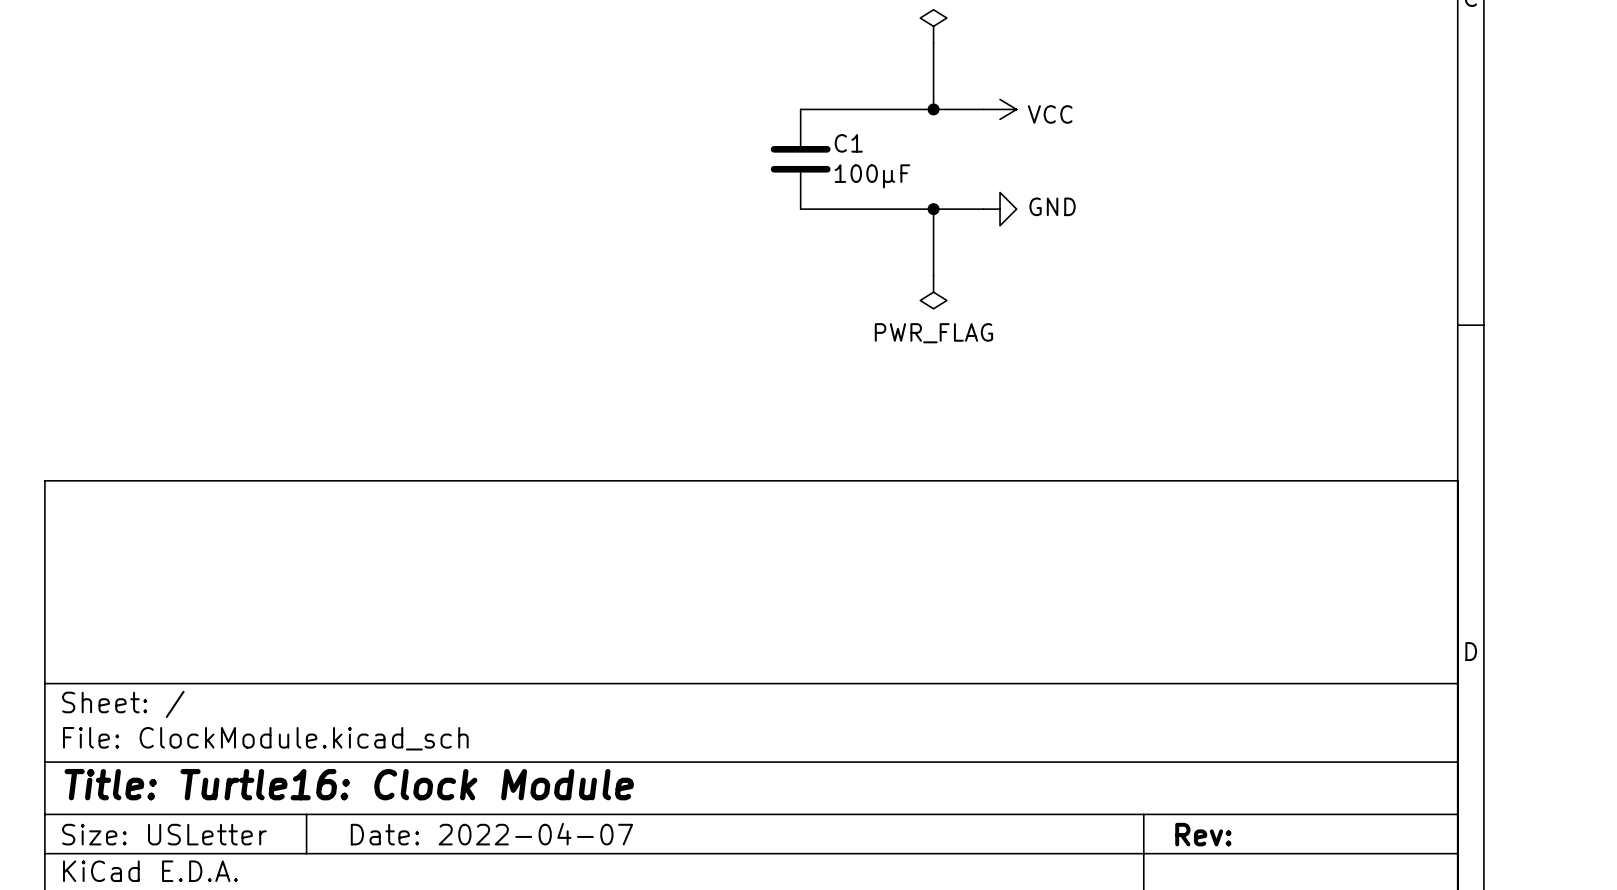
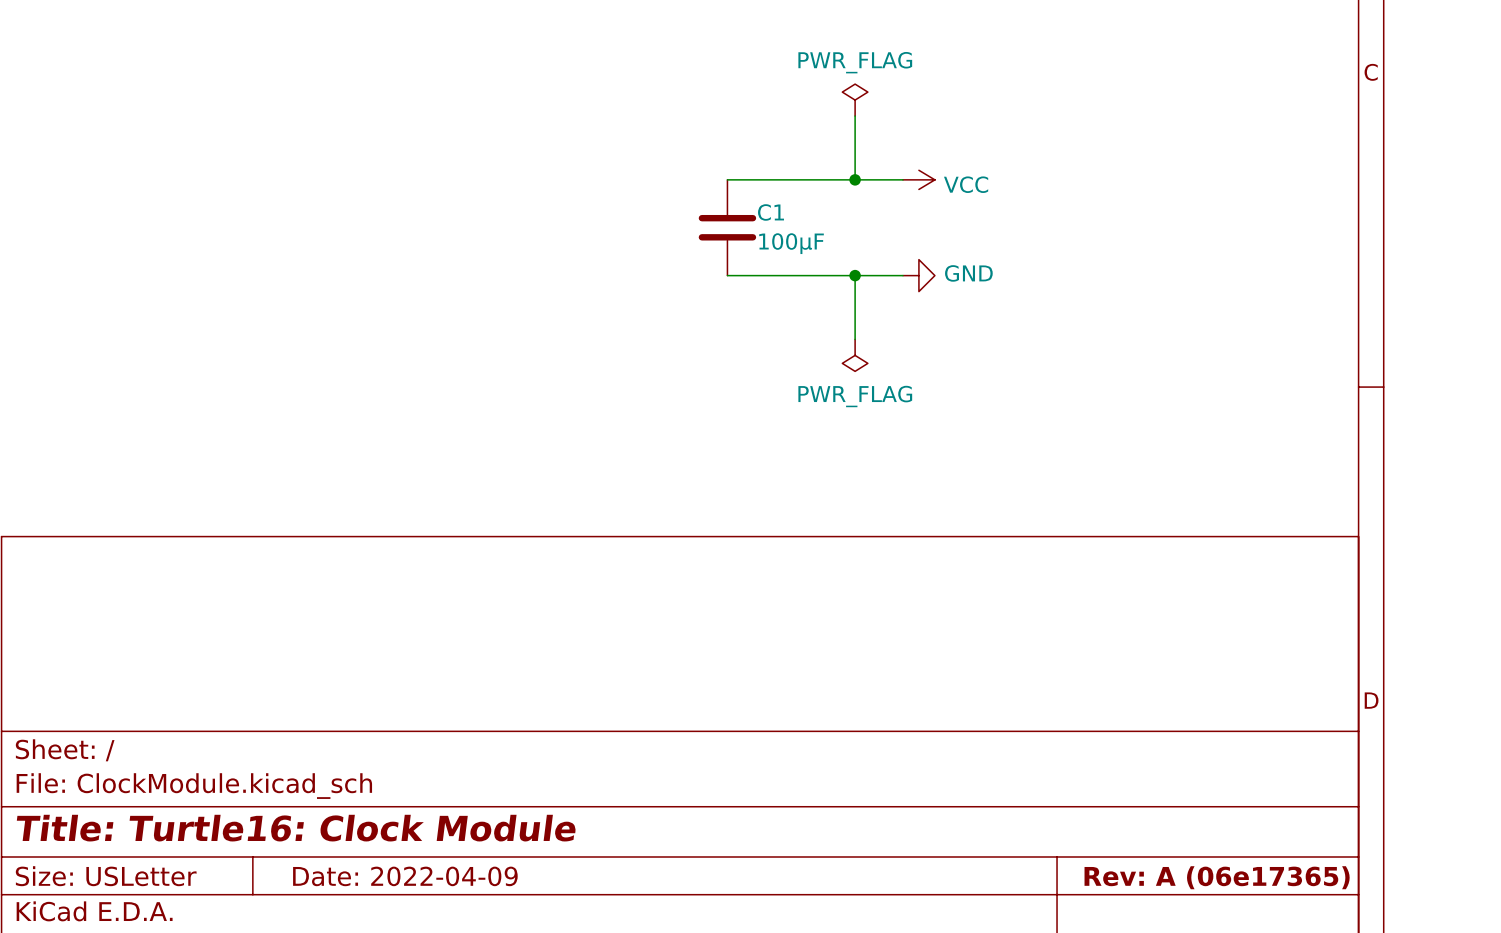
title block: Date: 2022-04-07 (491, 834) -> Date: 2022-04-09 (405, 876)
title block: Rev: (1203, 834) -> Rev: A (06e17365) (1217, 877)

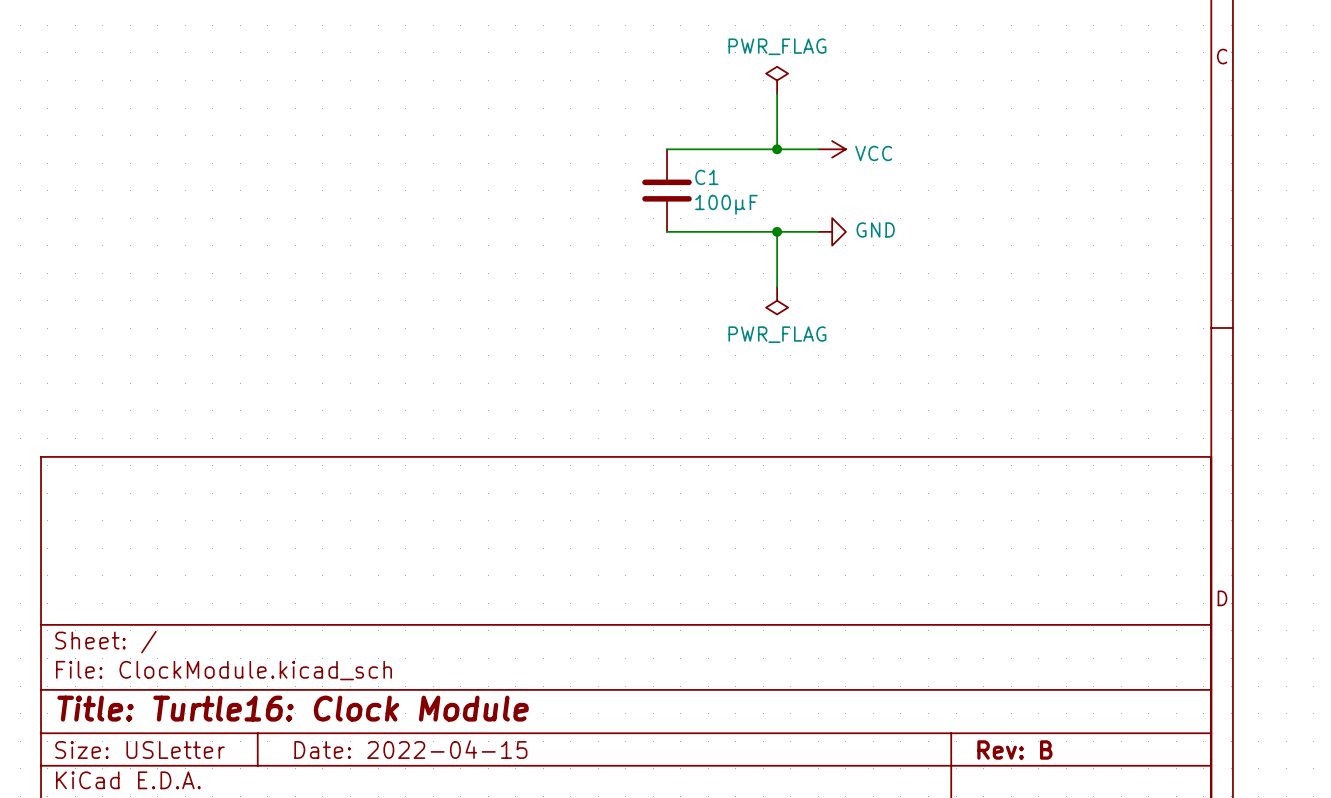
title block: Date: 2022-04-09 (405, 876) -> Date: 2022-04-15 (410, 749)
title block: Rev: A (06e17365) (1217, 877) -> Rev: B (1014, 749)

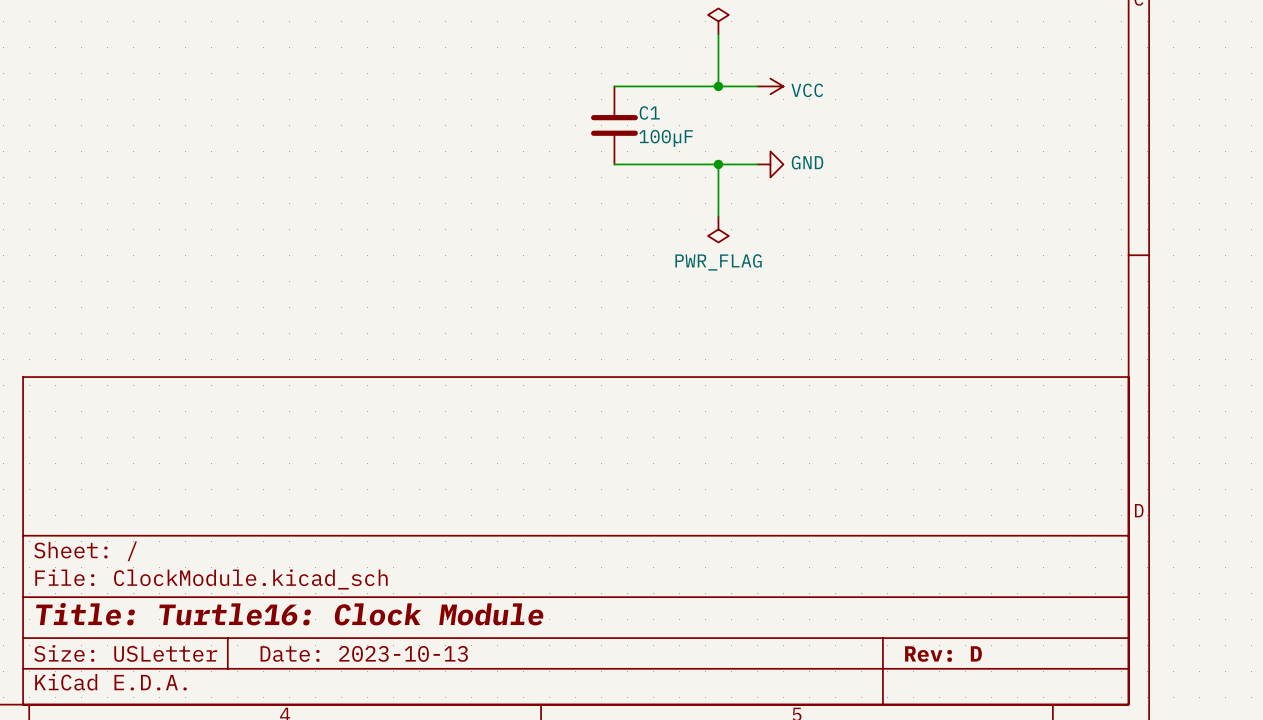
title block: Date: 2022-04-15 (410, 749) -> Date: 2023-10-13 (364, 653)
title block: Rev: B (1014, 749) -> Rev: D (943, 654)

